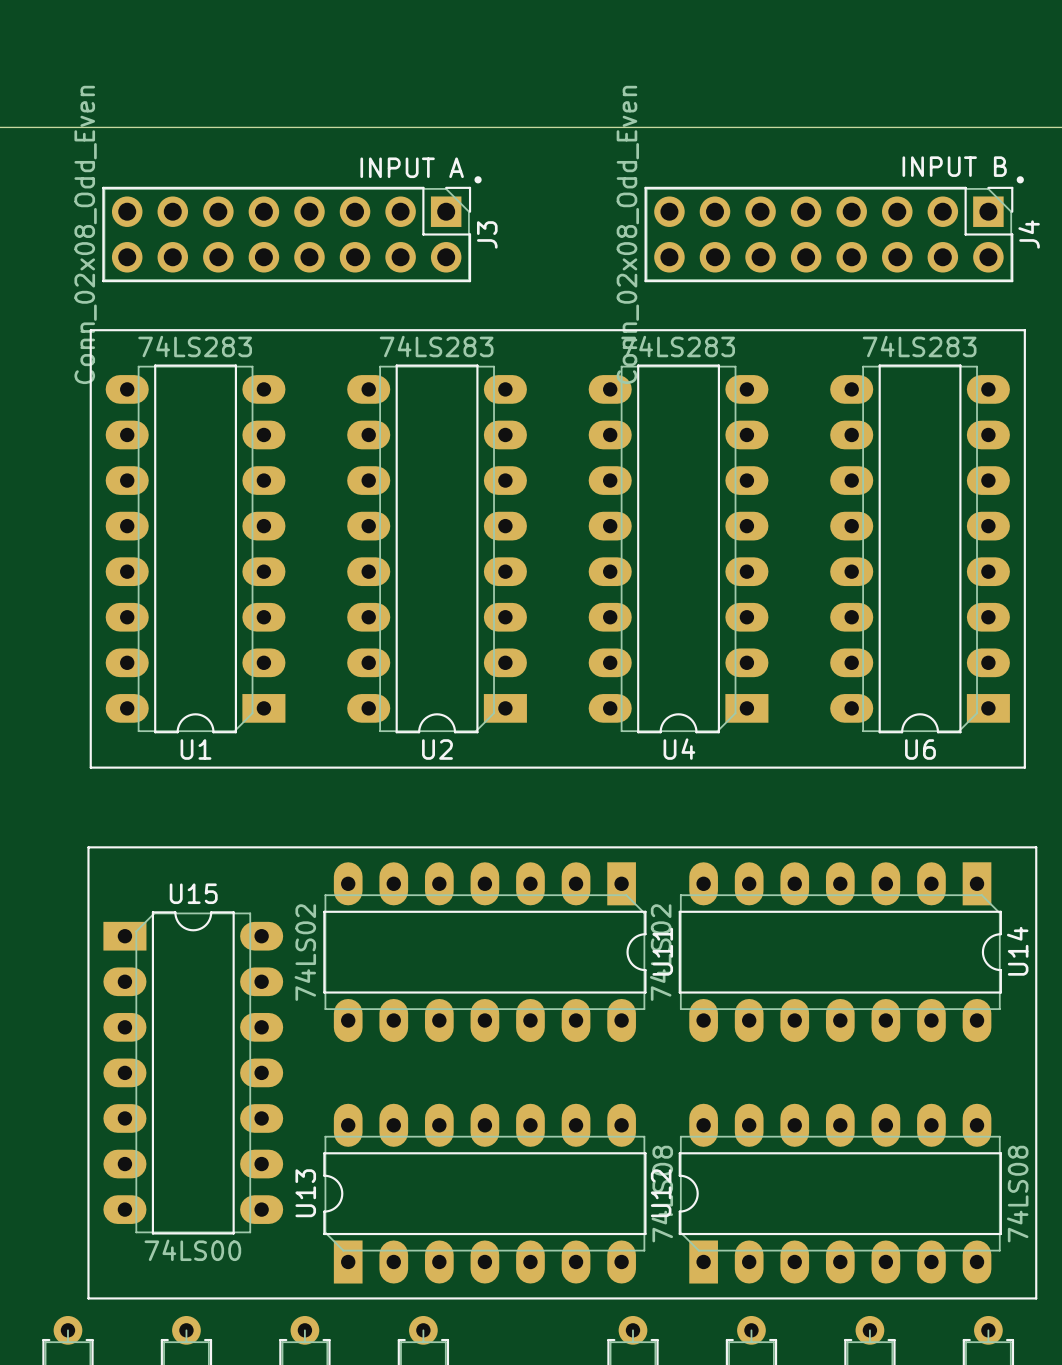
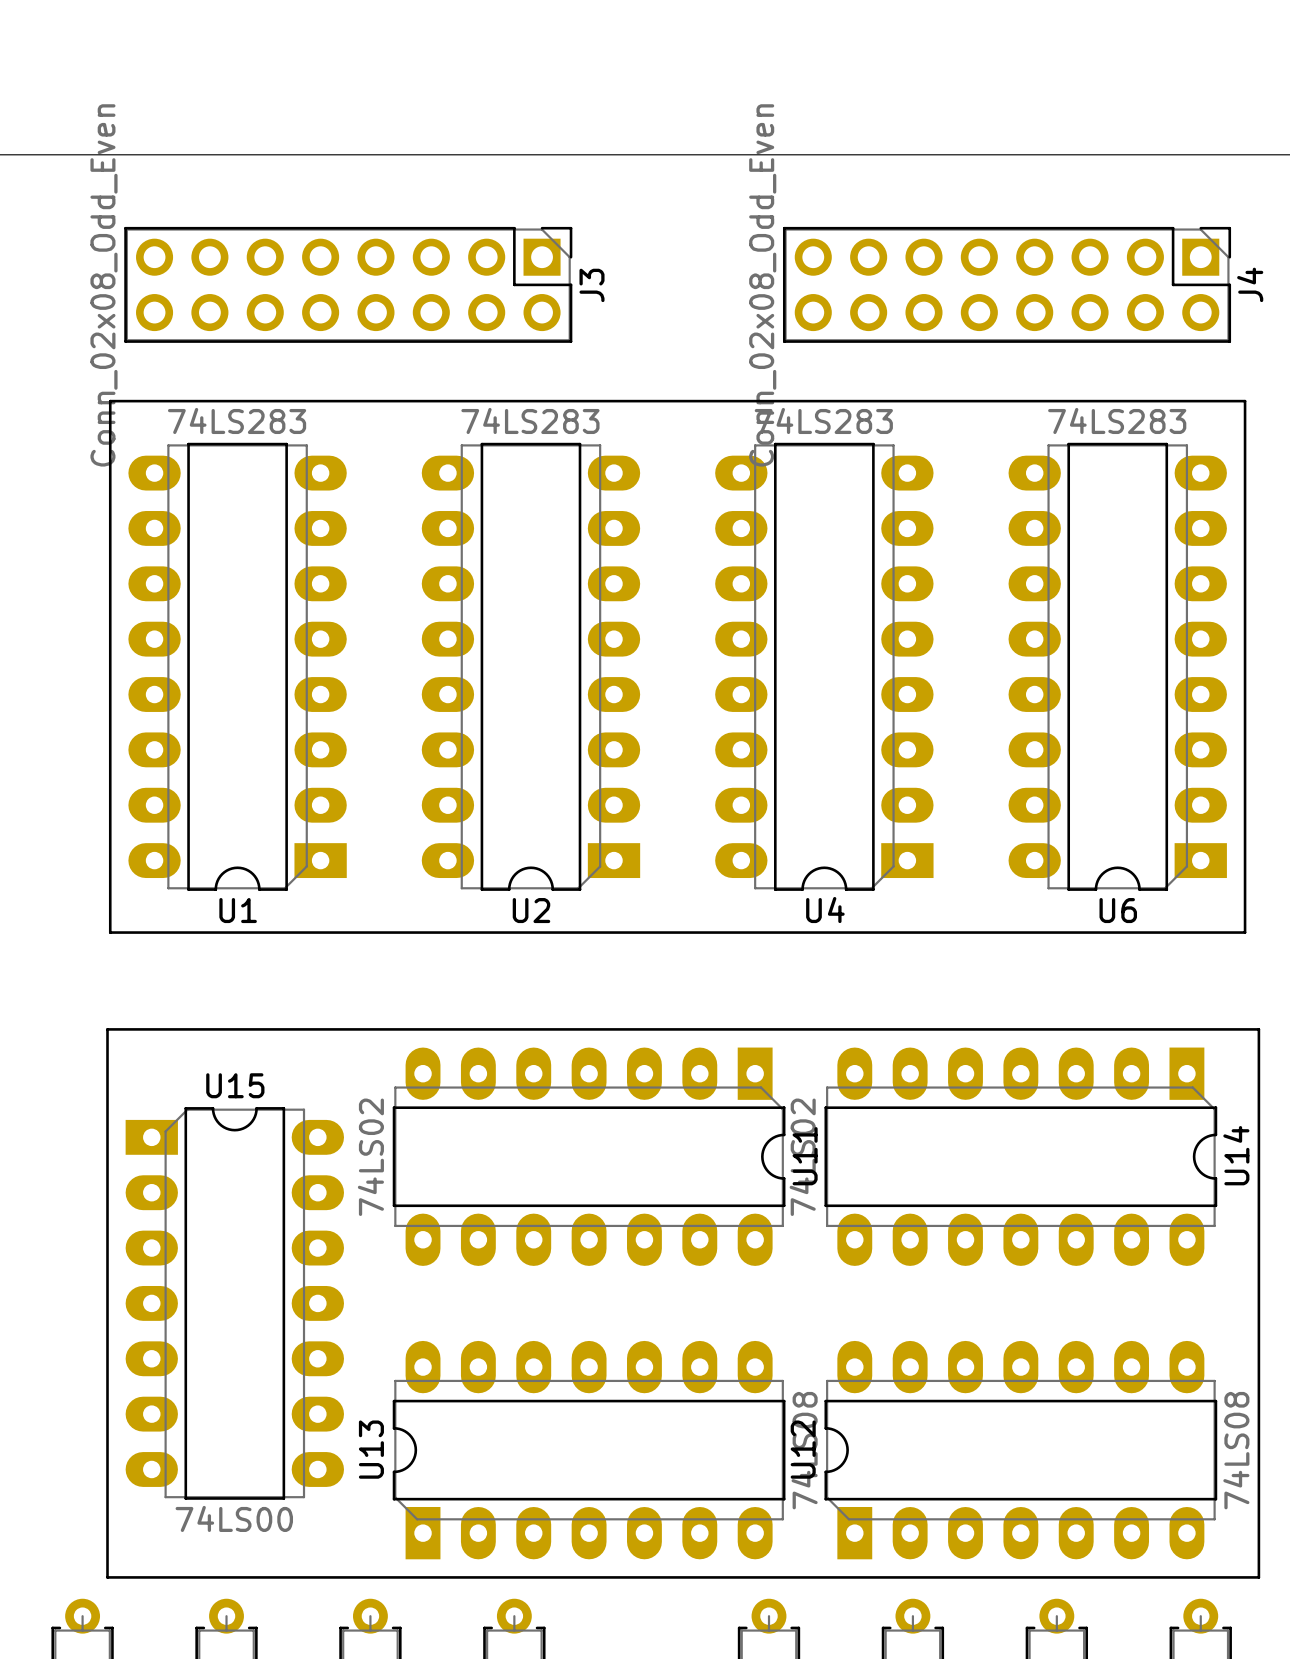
text: INPUT B (954, 166) -> none
text: INPUT A (412, 167) -> none
drawing: [474, 176, 482, 184] -> none
drawing: [1016, 176, 1024, 184] -> none

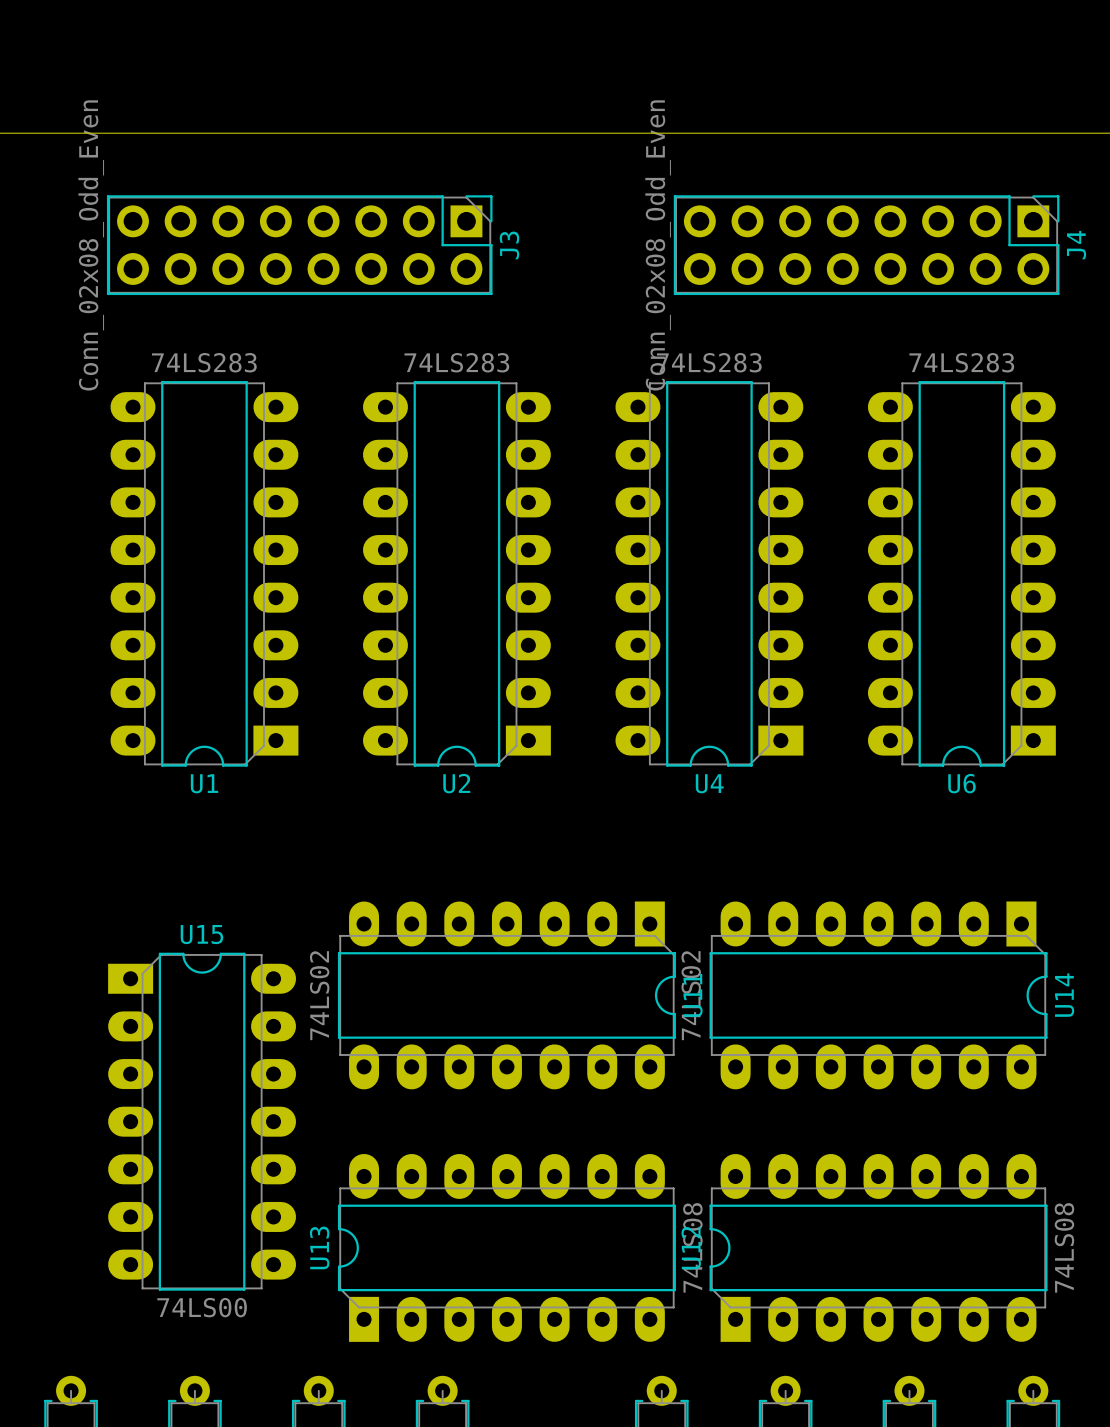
line: (110, 401) (110, 932) (1245, 932) (1245, 401) (110, 401) -> none
line: (107, 1029) (1258, 1029) (1258, 1577) (107, 1577) (107, 1029) -> none

